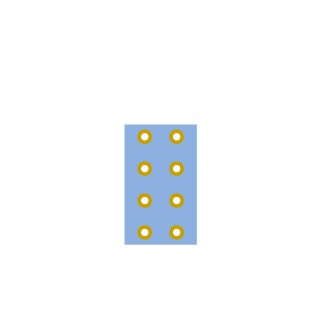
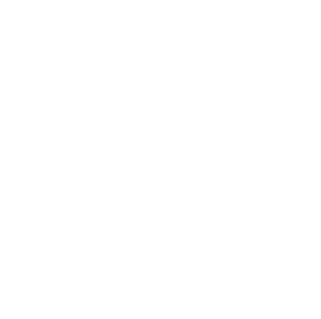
part: (160, 184) -> none

